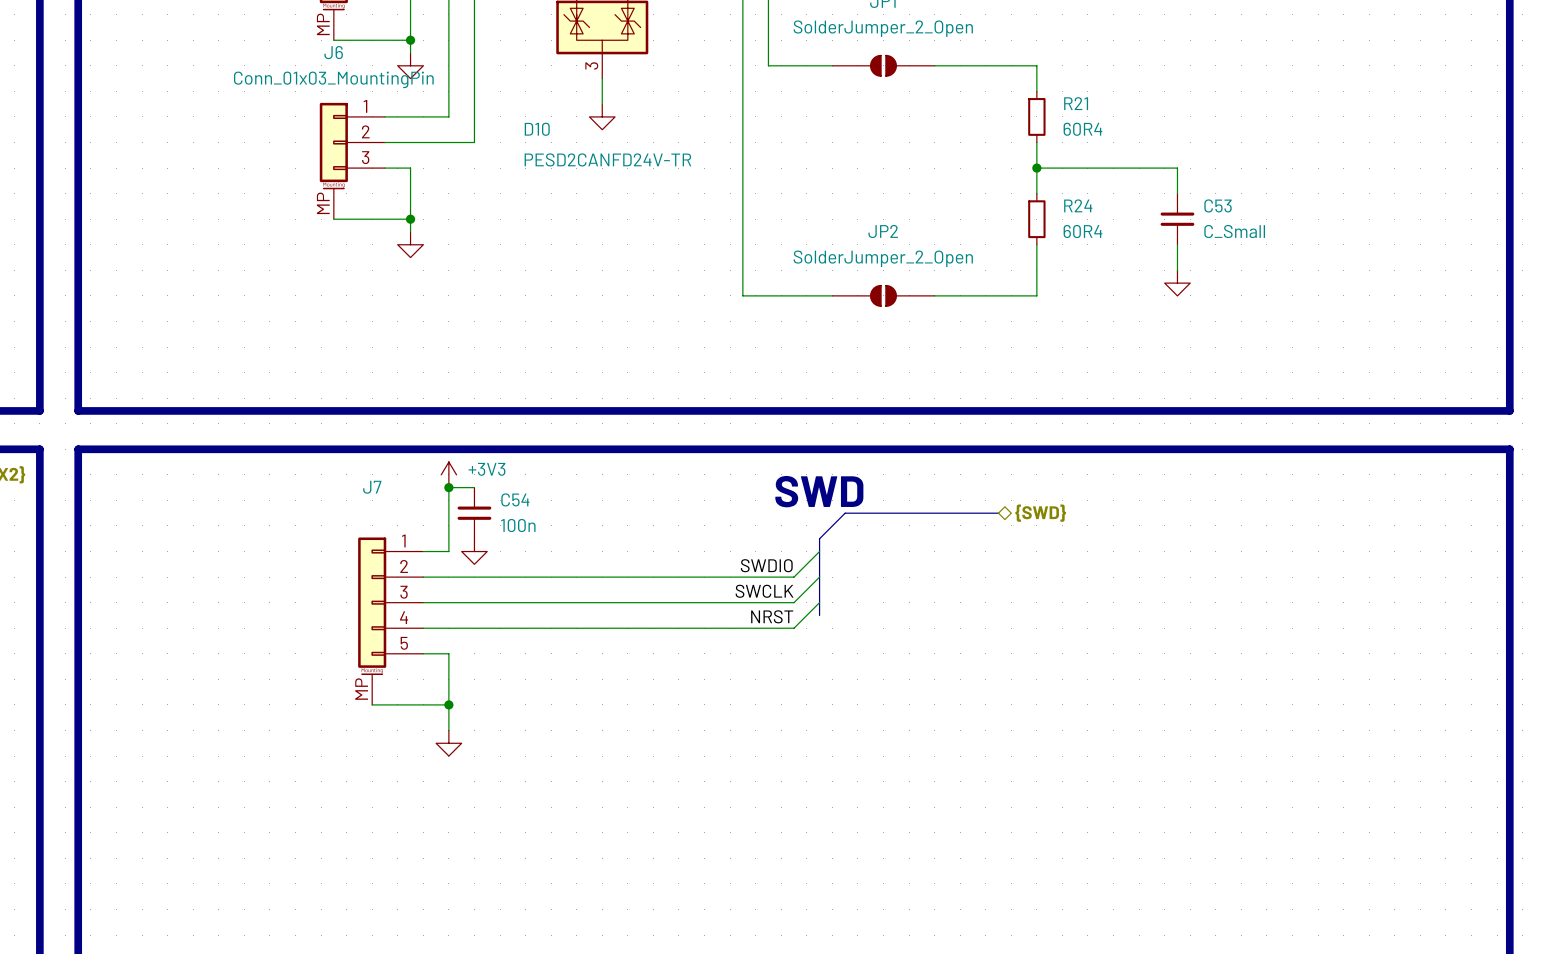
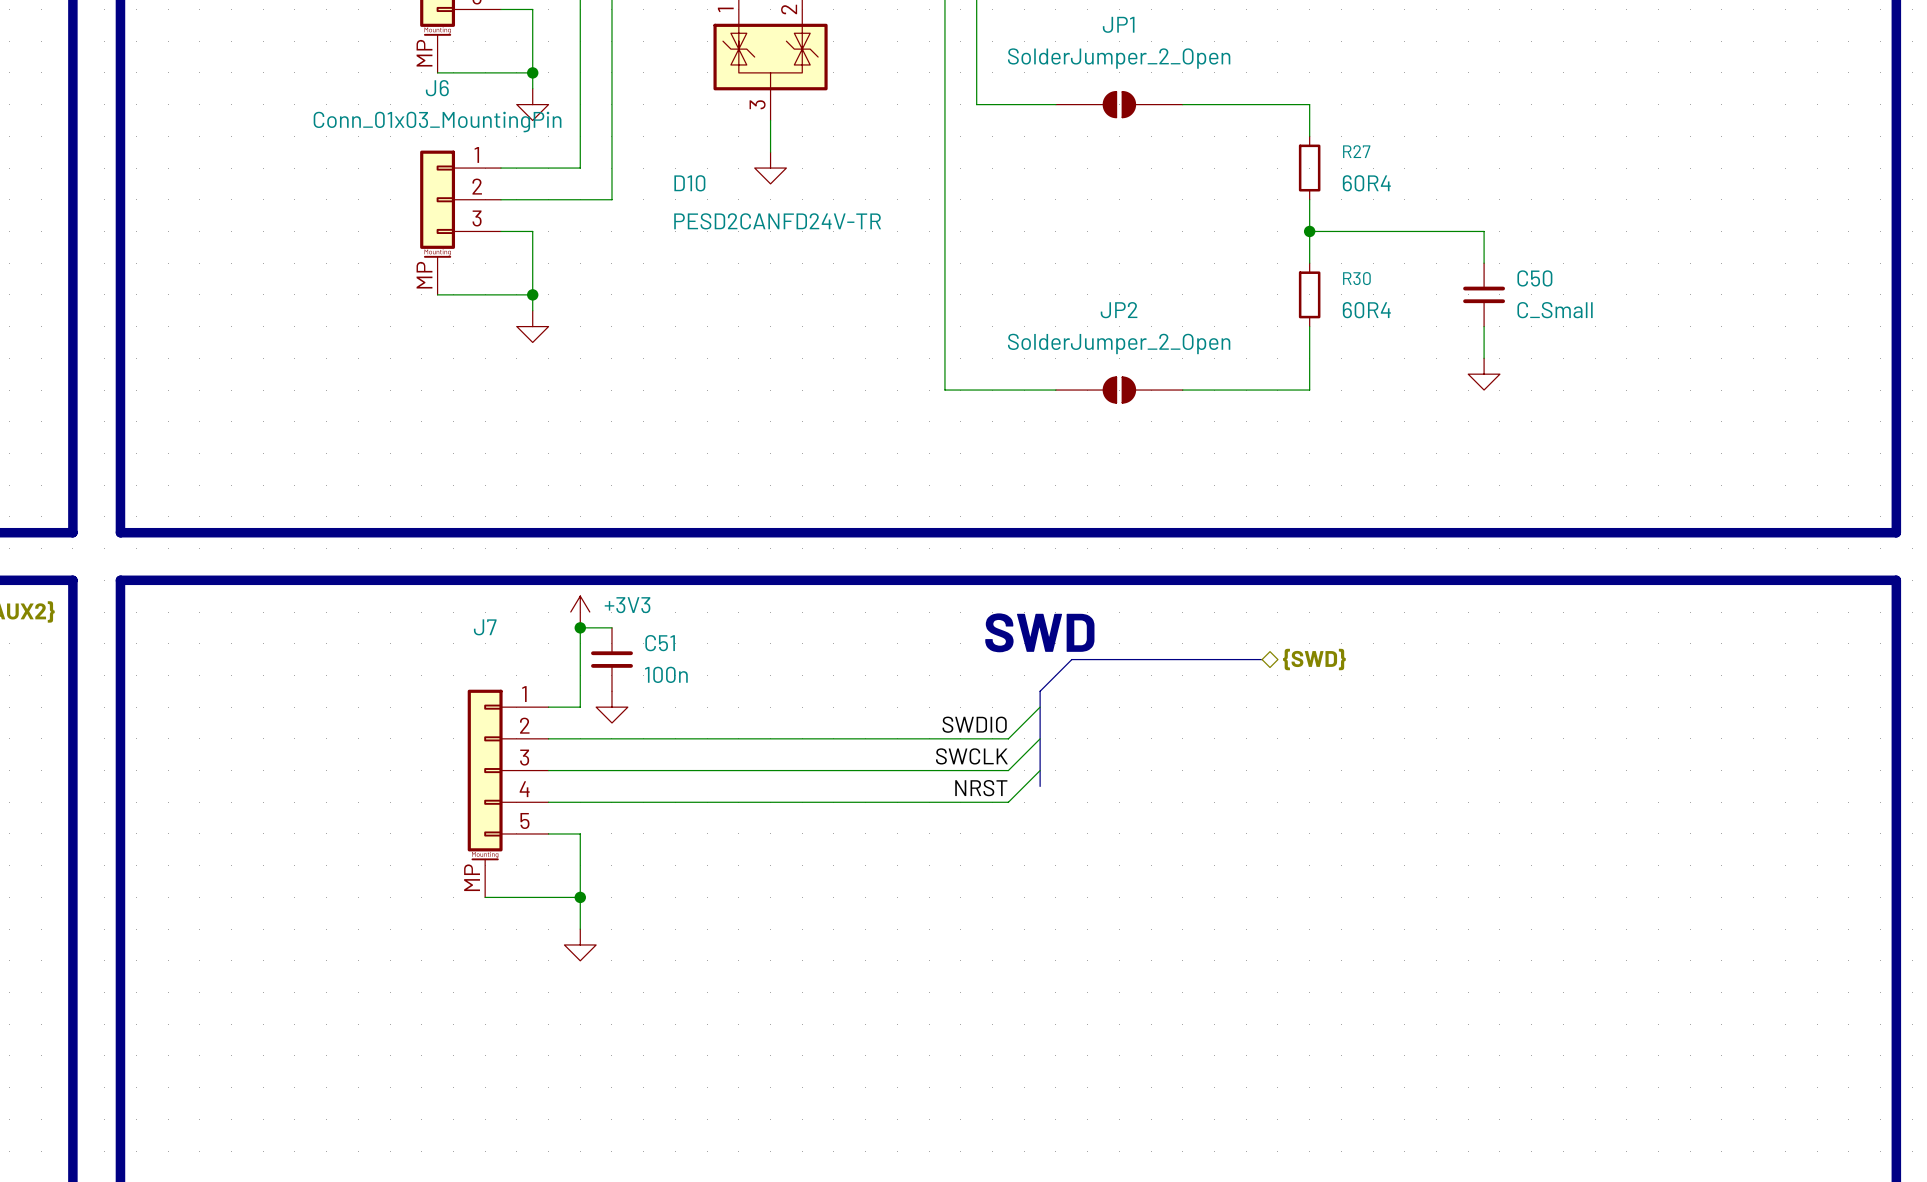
R21 name: R21 (1076, 103) -> R27 (1356, 151)
R24 name: R24 (1078, 205) -> R30 (1356, 278)
C53 name: C53 (1218, 205) -> C50 (1534, 278)
C54 name: C54 (515, 499) -> C51 (660, 643)

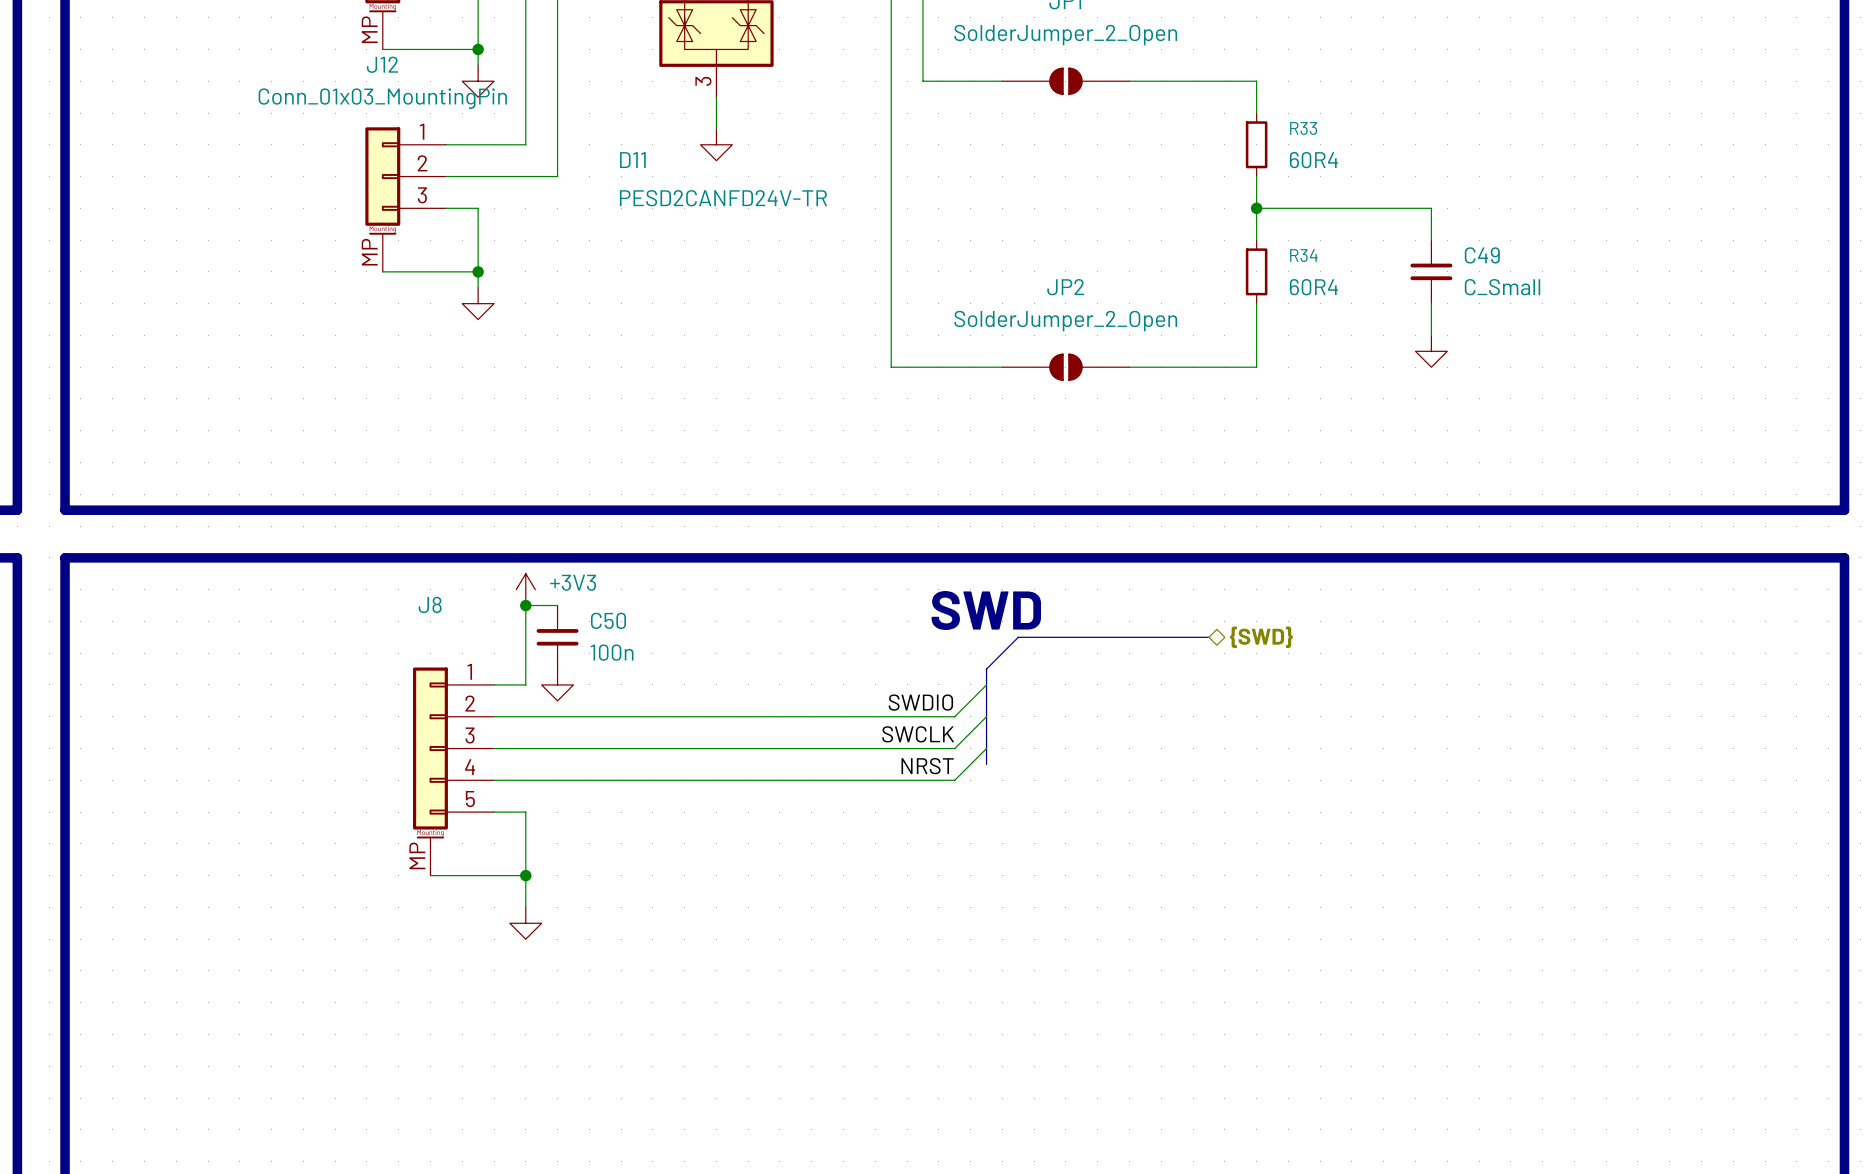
J6 name: J6 (437, 88) -> J12 (382, 64)
R27 name: R27 (1356, 151) -> R33 (1303, 128)
D10 name: D10 (689, 183) -> D11 (632, 160)
R30 name: R30 (1356, 278) -> R34 (1303, 255)
C50 name: C50 (1534, 278) -> C49 (1482, 255)
J7 name: J7 (485, 627) -> J8 (430, 604)
C51 name: C51 (660, 643) -> C50 (608, 620)

